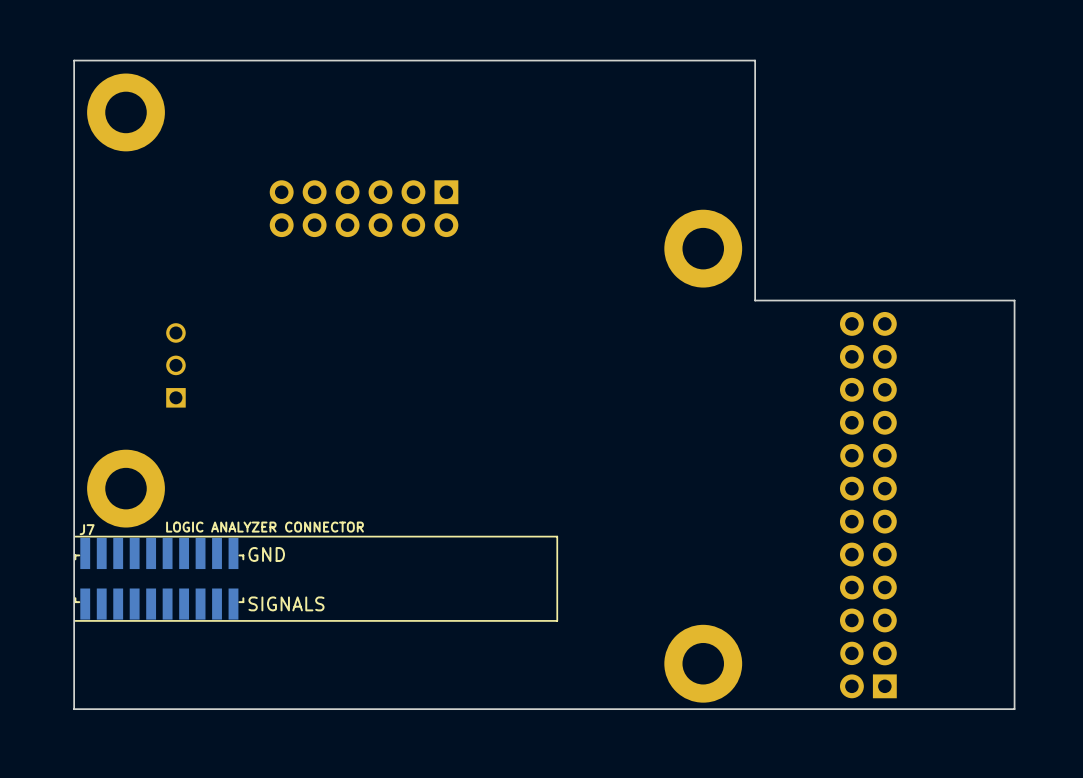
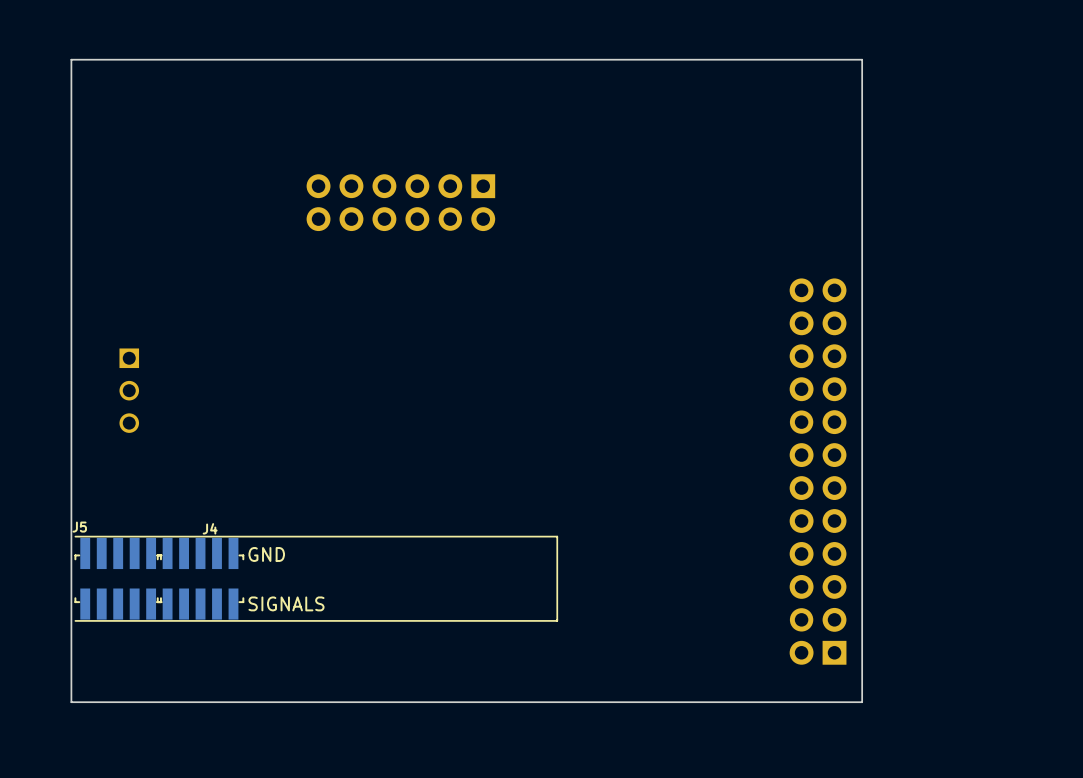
board edge: (755, 60) (755, 300) (1014, 300) (1014, 709) (74, 709) (74, 60) (755, 60) -> (862, 59) (862, 702) (71, 702) (71, 59) (862, 59)
part: (126, 112) -> none
part position: (364, 208) -> (400, 202)
part: (703, 248) -> none
part rotation: 0° (175, 365) -> 180° (129, 390)
part position: (175, 365) -> (129, 390)
part: (126, 488) -> none
part position: (868, 505) -> (818, 471)
text: LOGIC ANALYZER CONNECTOR (265, 527) -> none
J5: none -> (118, 578)
J7: (159, 578) -> none
J4: none -> (200, 578)
part: (703, 663) -> none

